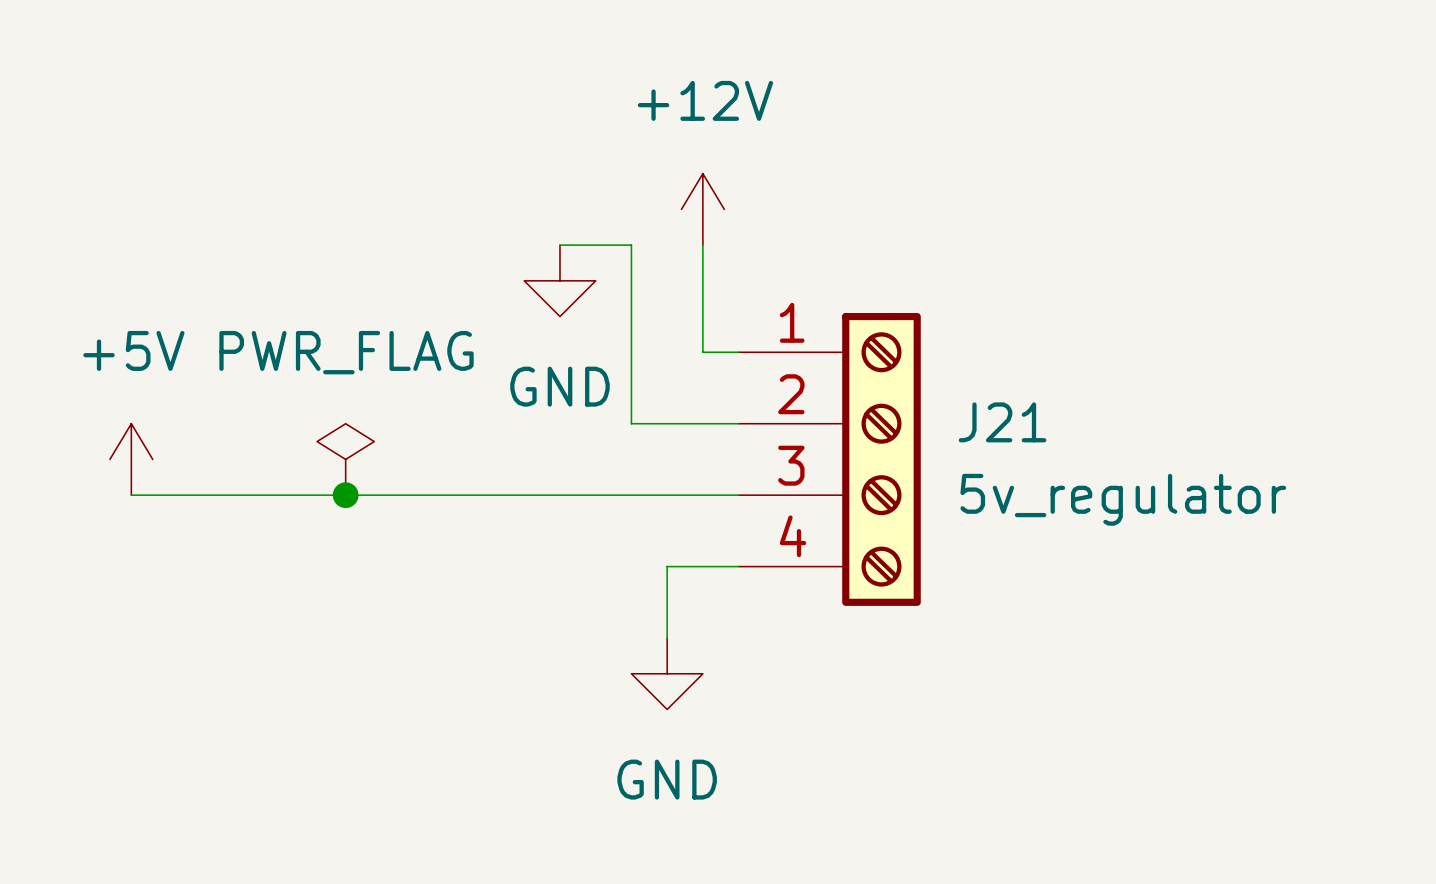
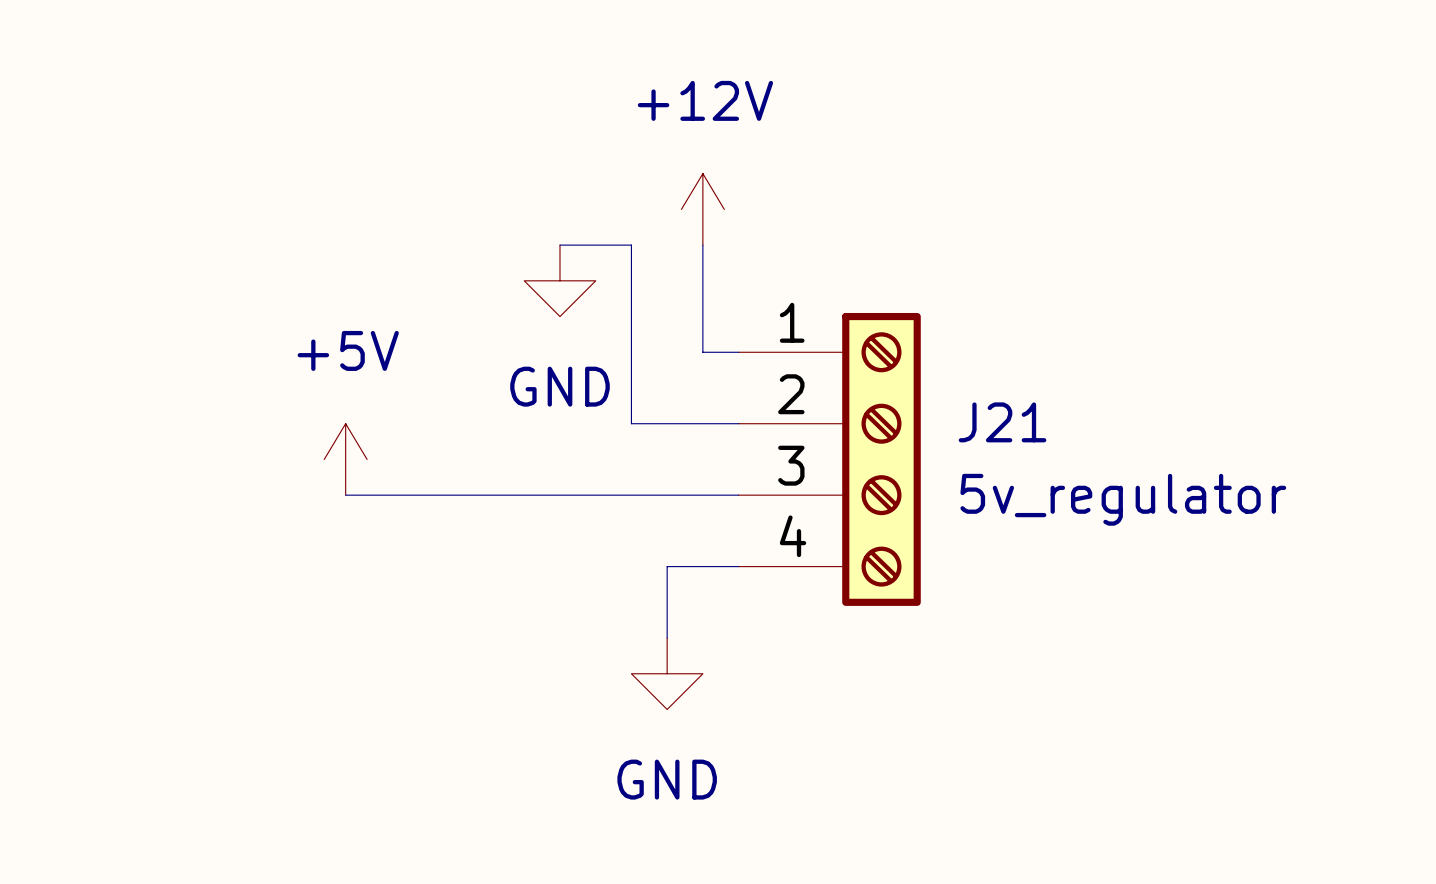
power symbol: +5V (131, 459) -> none
power symbol: PWR_FLAG (345, 459) -> +5V (345, 459)
wire: (131, 495) (345, 495) -> none
junction: (345, 495) -> none

